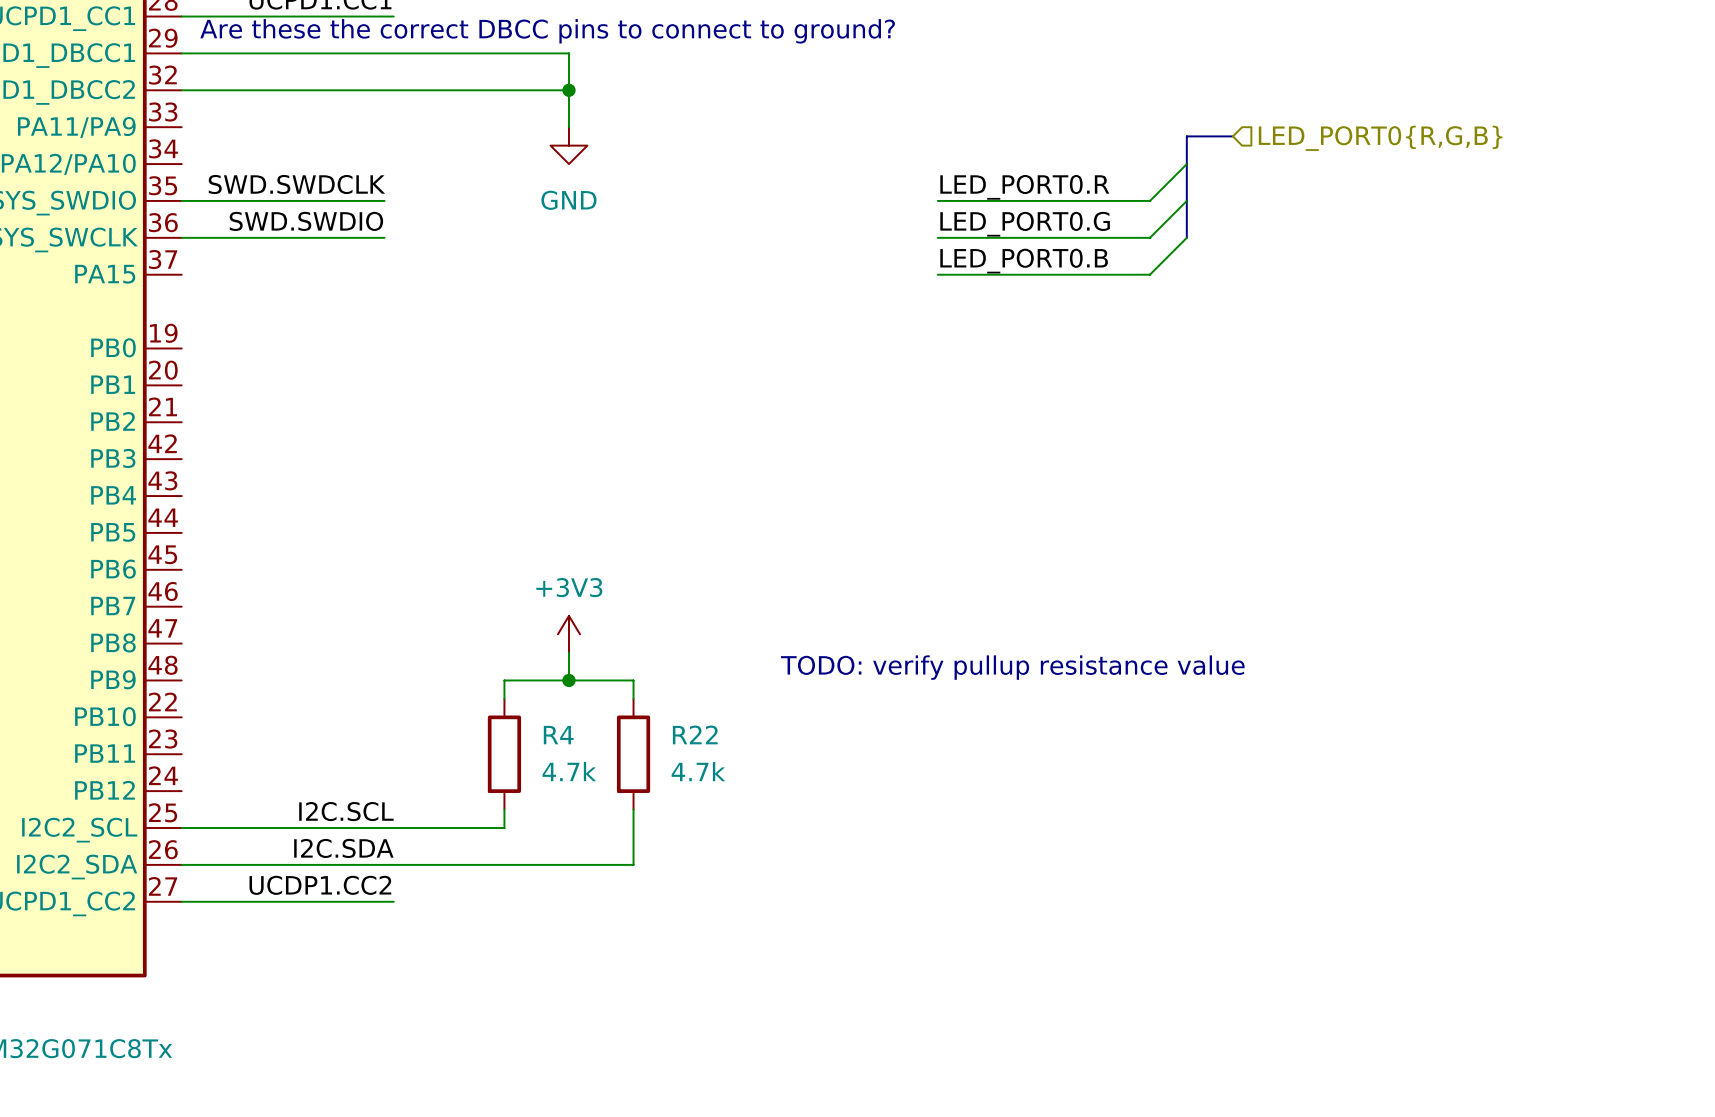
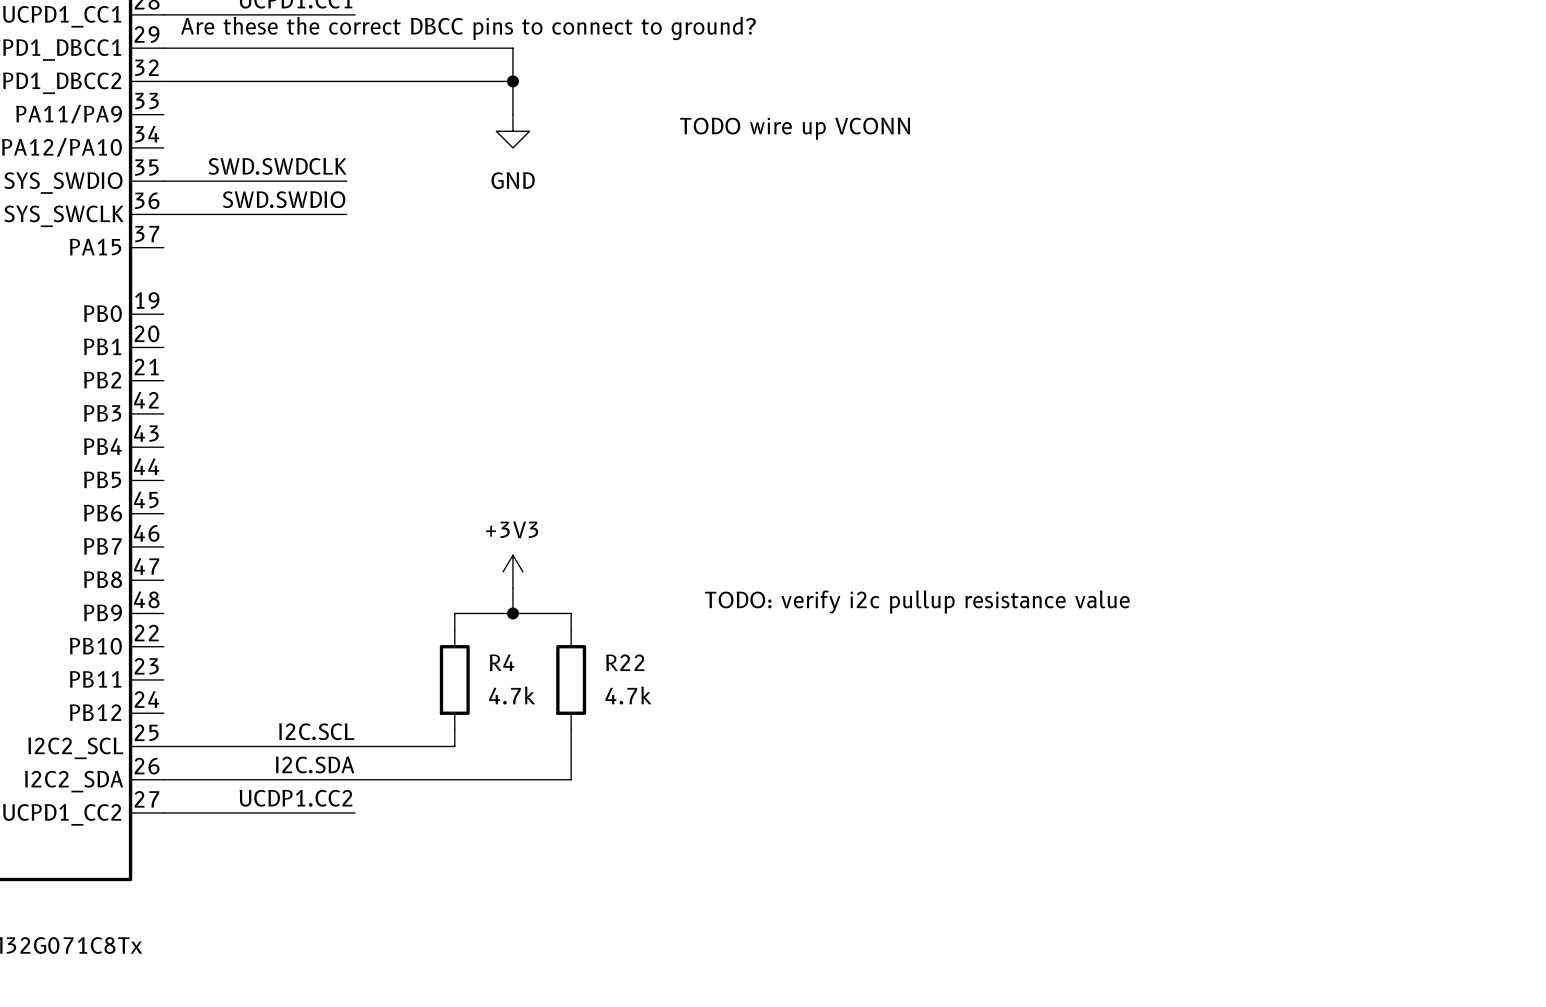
bus: (1232, 136) (1186, 136) (1186, 237) -> none
hierarchical label: LED_PORT0{R,G,B} (1380, 138) -> none
text: none -> TODO wire up VCONN (795, 128)
wire: (1186, 164) (1149, 200) (937, 200) -> none
label: LED_PORT0.R (1024, 187) -> none
wire: (1186, 200) (1149, 237) (937, 237) -> none
label: LED_PORT0.G (1025, 224) -> none
wire: (1186, 237) (1149, 274) (937, 274) -> none
label: LED_PORT0.B (1024, 261) -> none
text: TODO: verify pullup resistance value (1012, 667) -> TODO: verify i2c pullup resistance value (917, 602)

